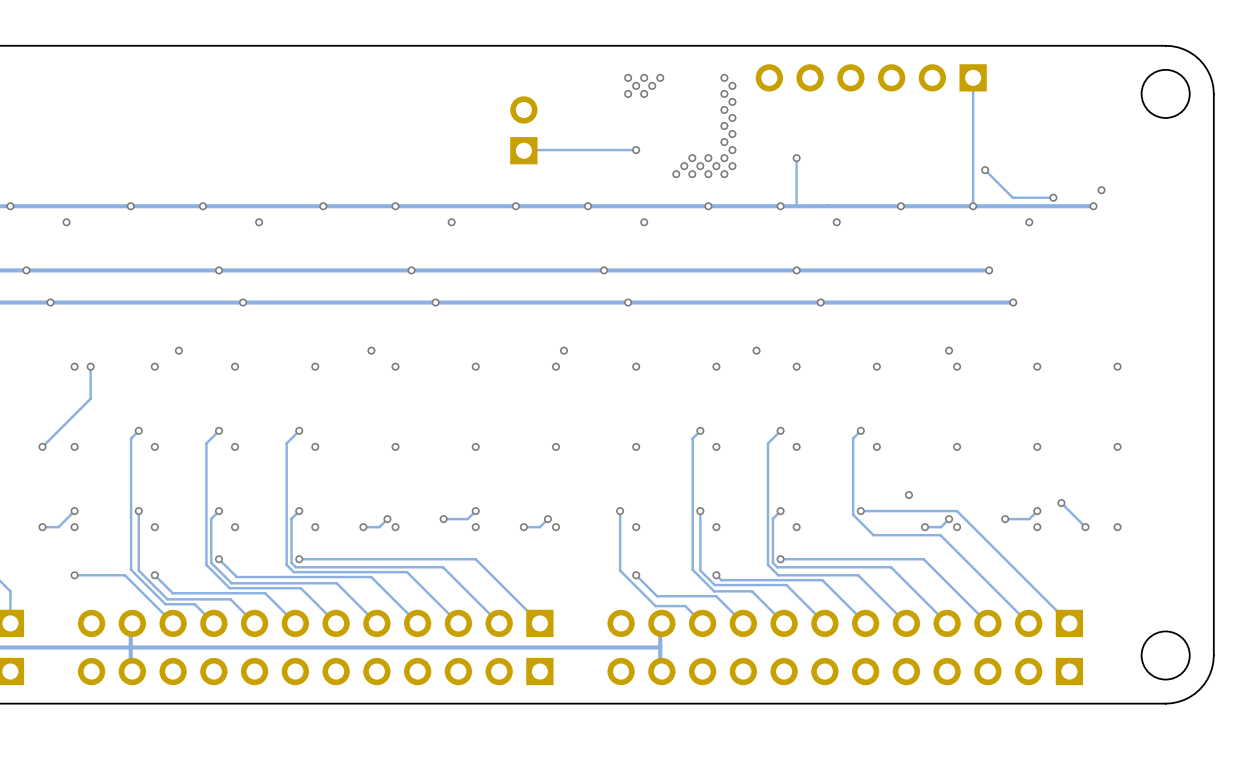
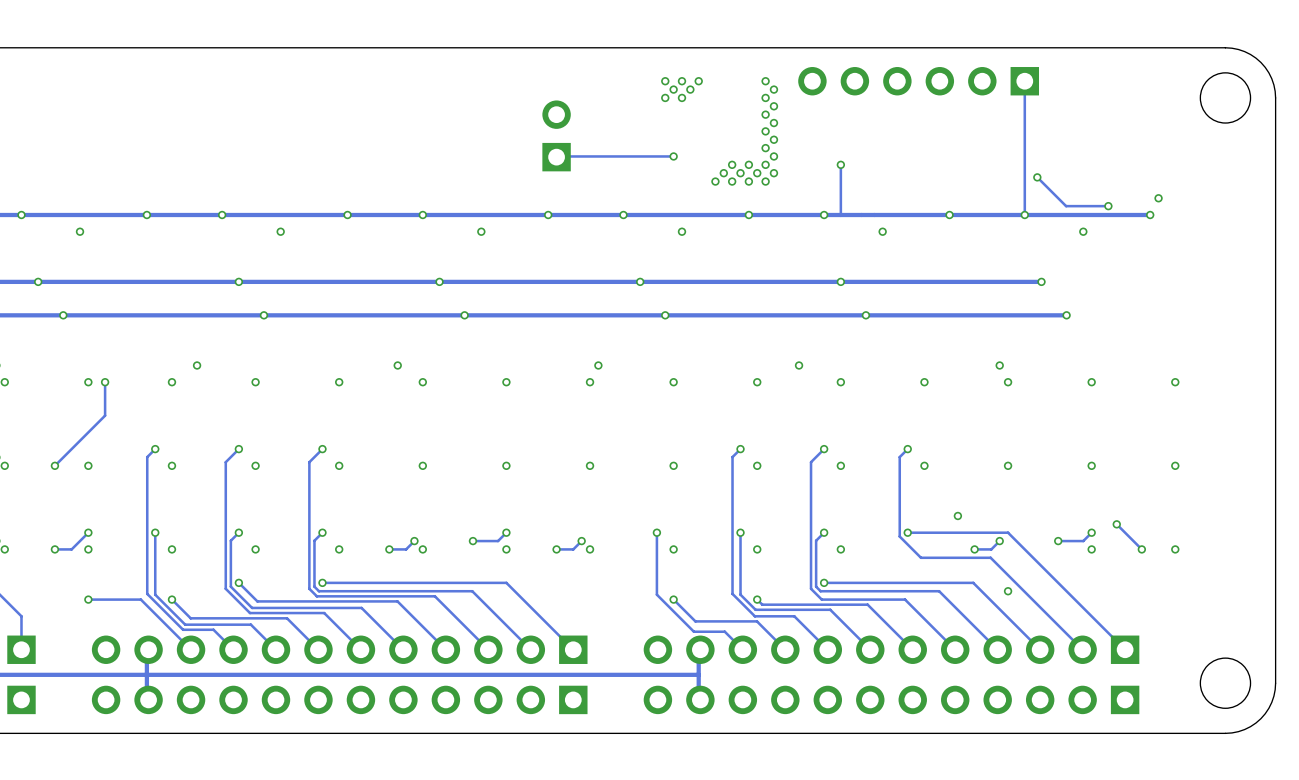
via position: (957, 527) -> (1008, 591)

